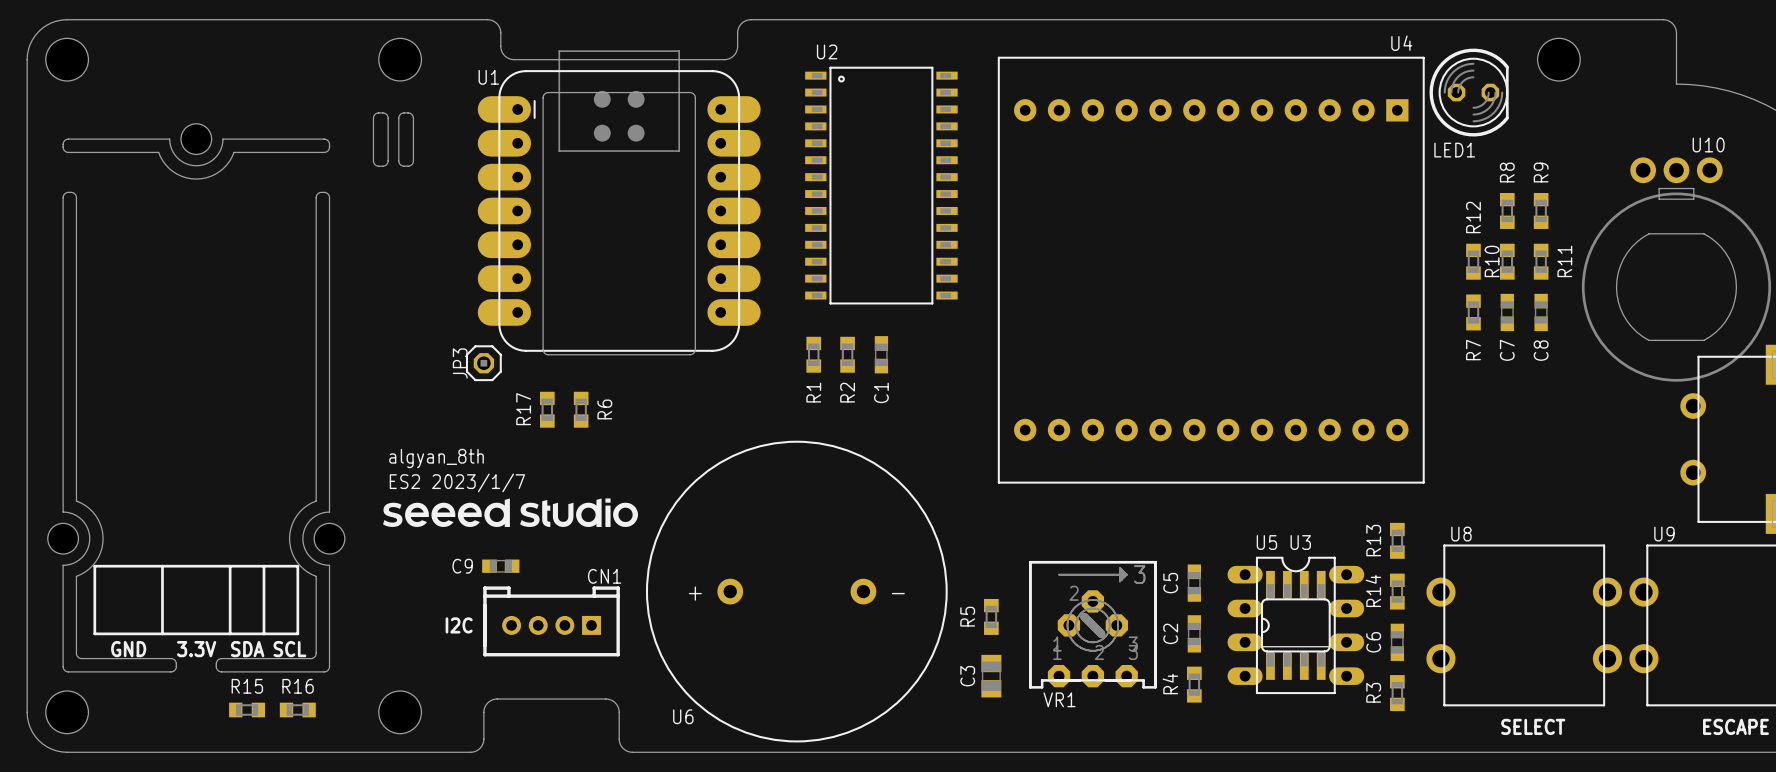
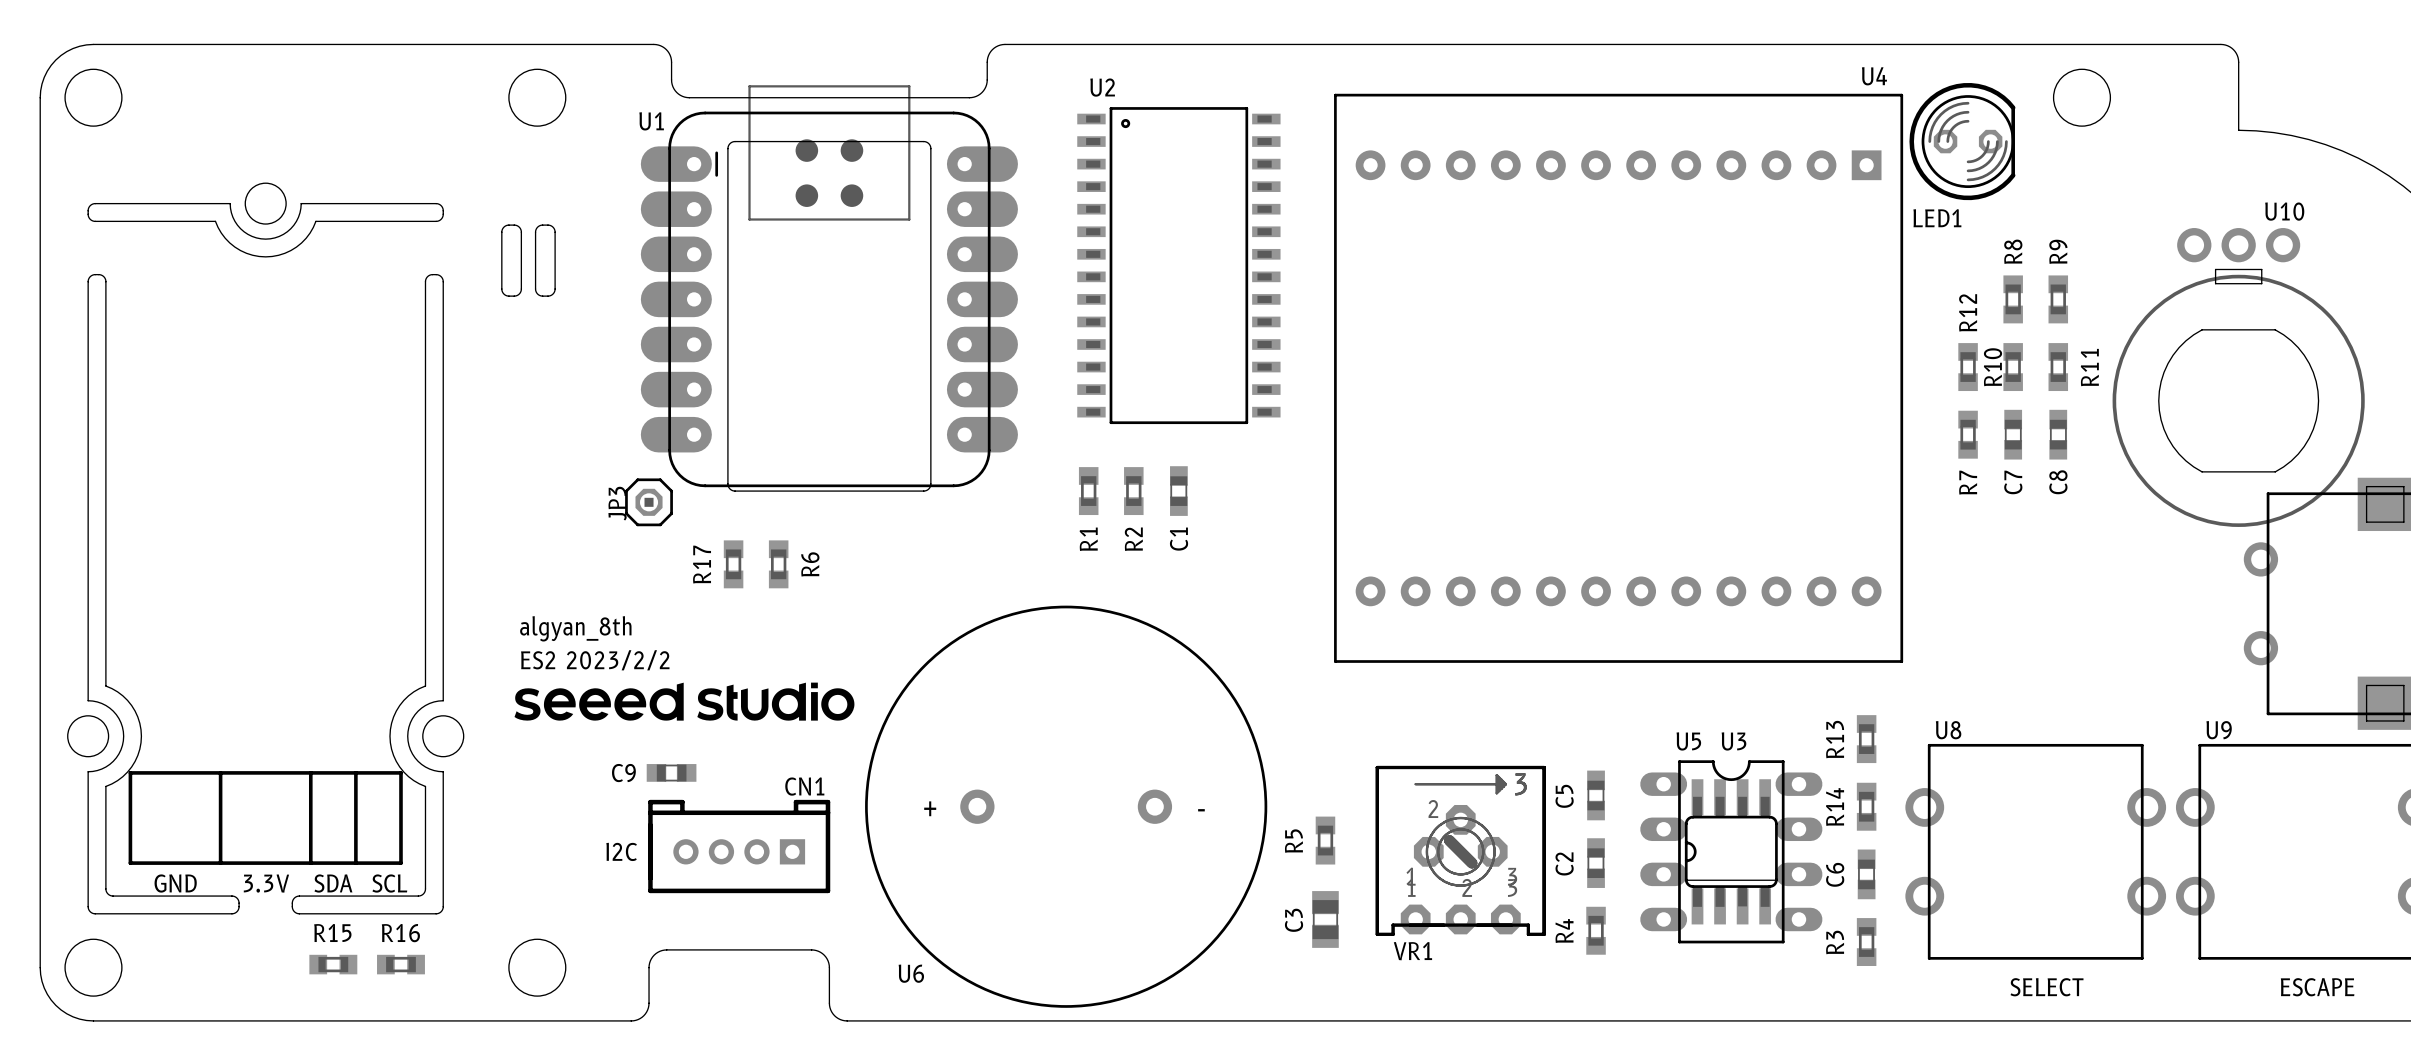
board edge: (373, 160) (373, 117) (378, 112) (385, 113) (388, 117) (388, 160) -> (501, 232) (503, 227) (508, 225) (517, 226) (521, 232)
board edge: (373, 160) (375, 164) (378, 166) (385, 165) (388, 160) -> (501, 232) (501, 289) (504, 294) (508, 296) (517, 295) (521, 289) (521, 232)
board edge: (398, 160) (398, 117) (404, 112) (410, 113) (413, 117) (413, 160) -> (535, 232) (537, 227) (542, 225) (551, 226) (555, 232)
board edge: (398, 160) (400, 164) (404, 166) (410, 165) (413, 160) -> (535, 232) (535, 289) (538, 294) (542, 296) (551, 295) (555, 289) (555, 232)
text: ES2 2023/1/7 (457, 482) -> ES2 2023/2/2 (595, 660)

